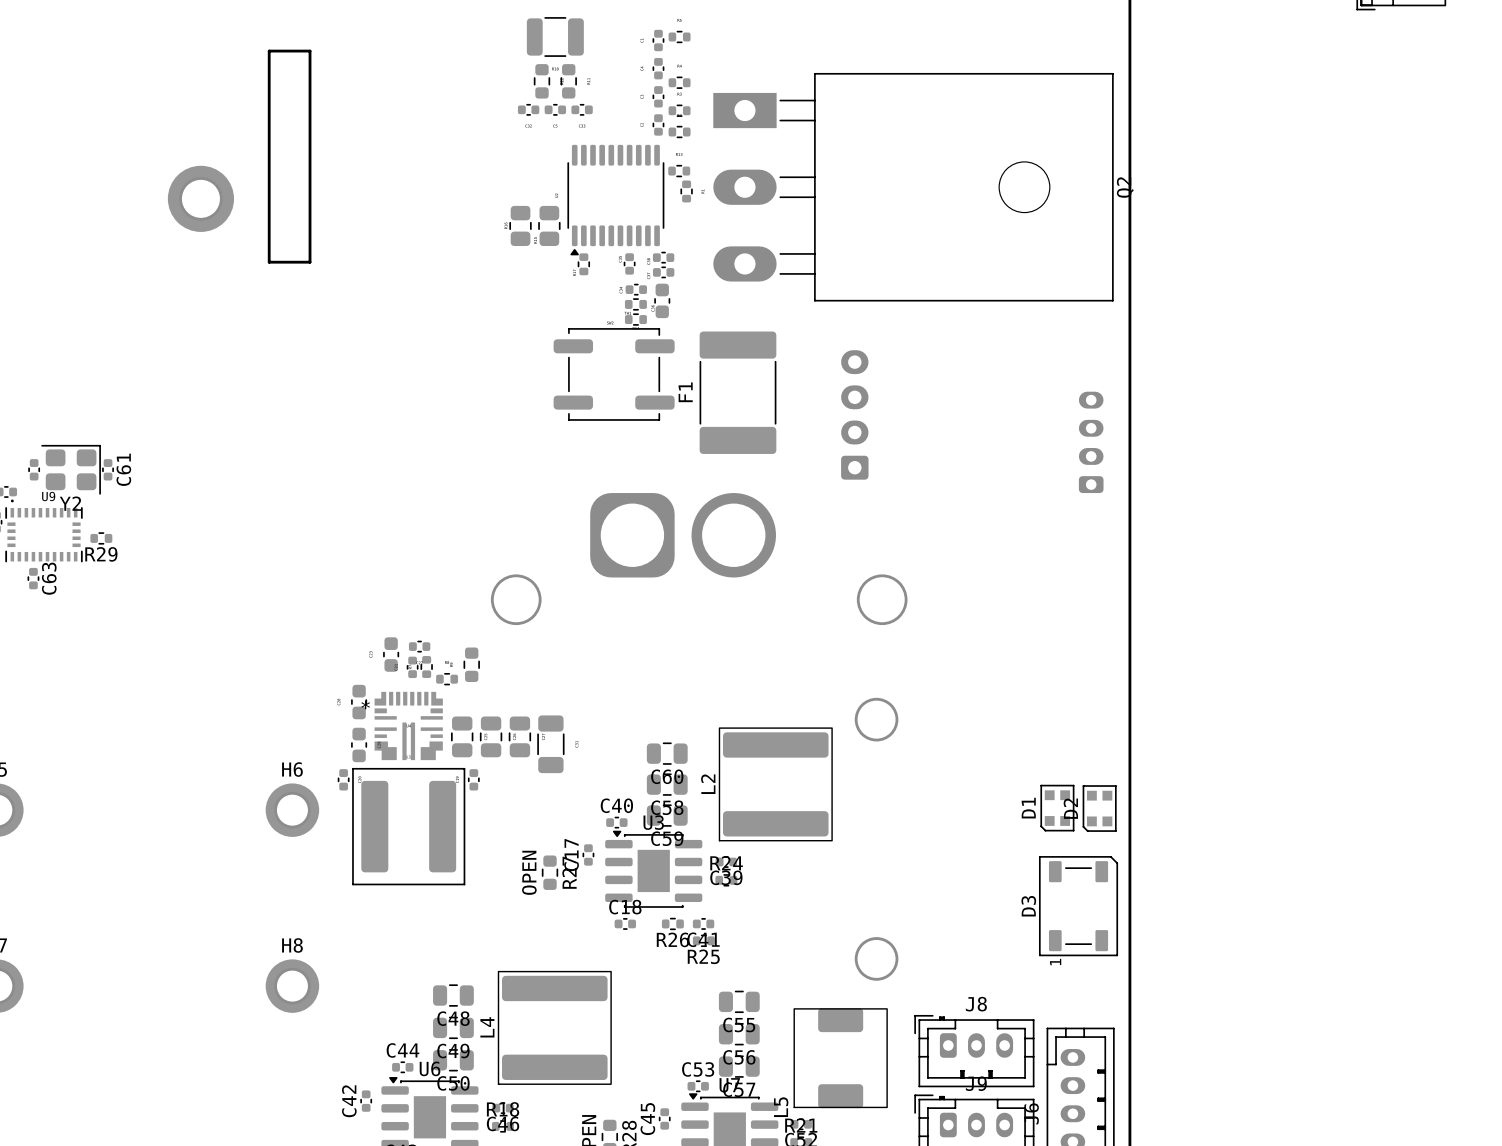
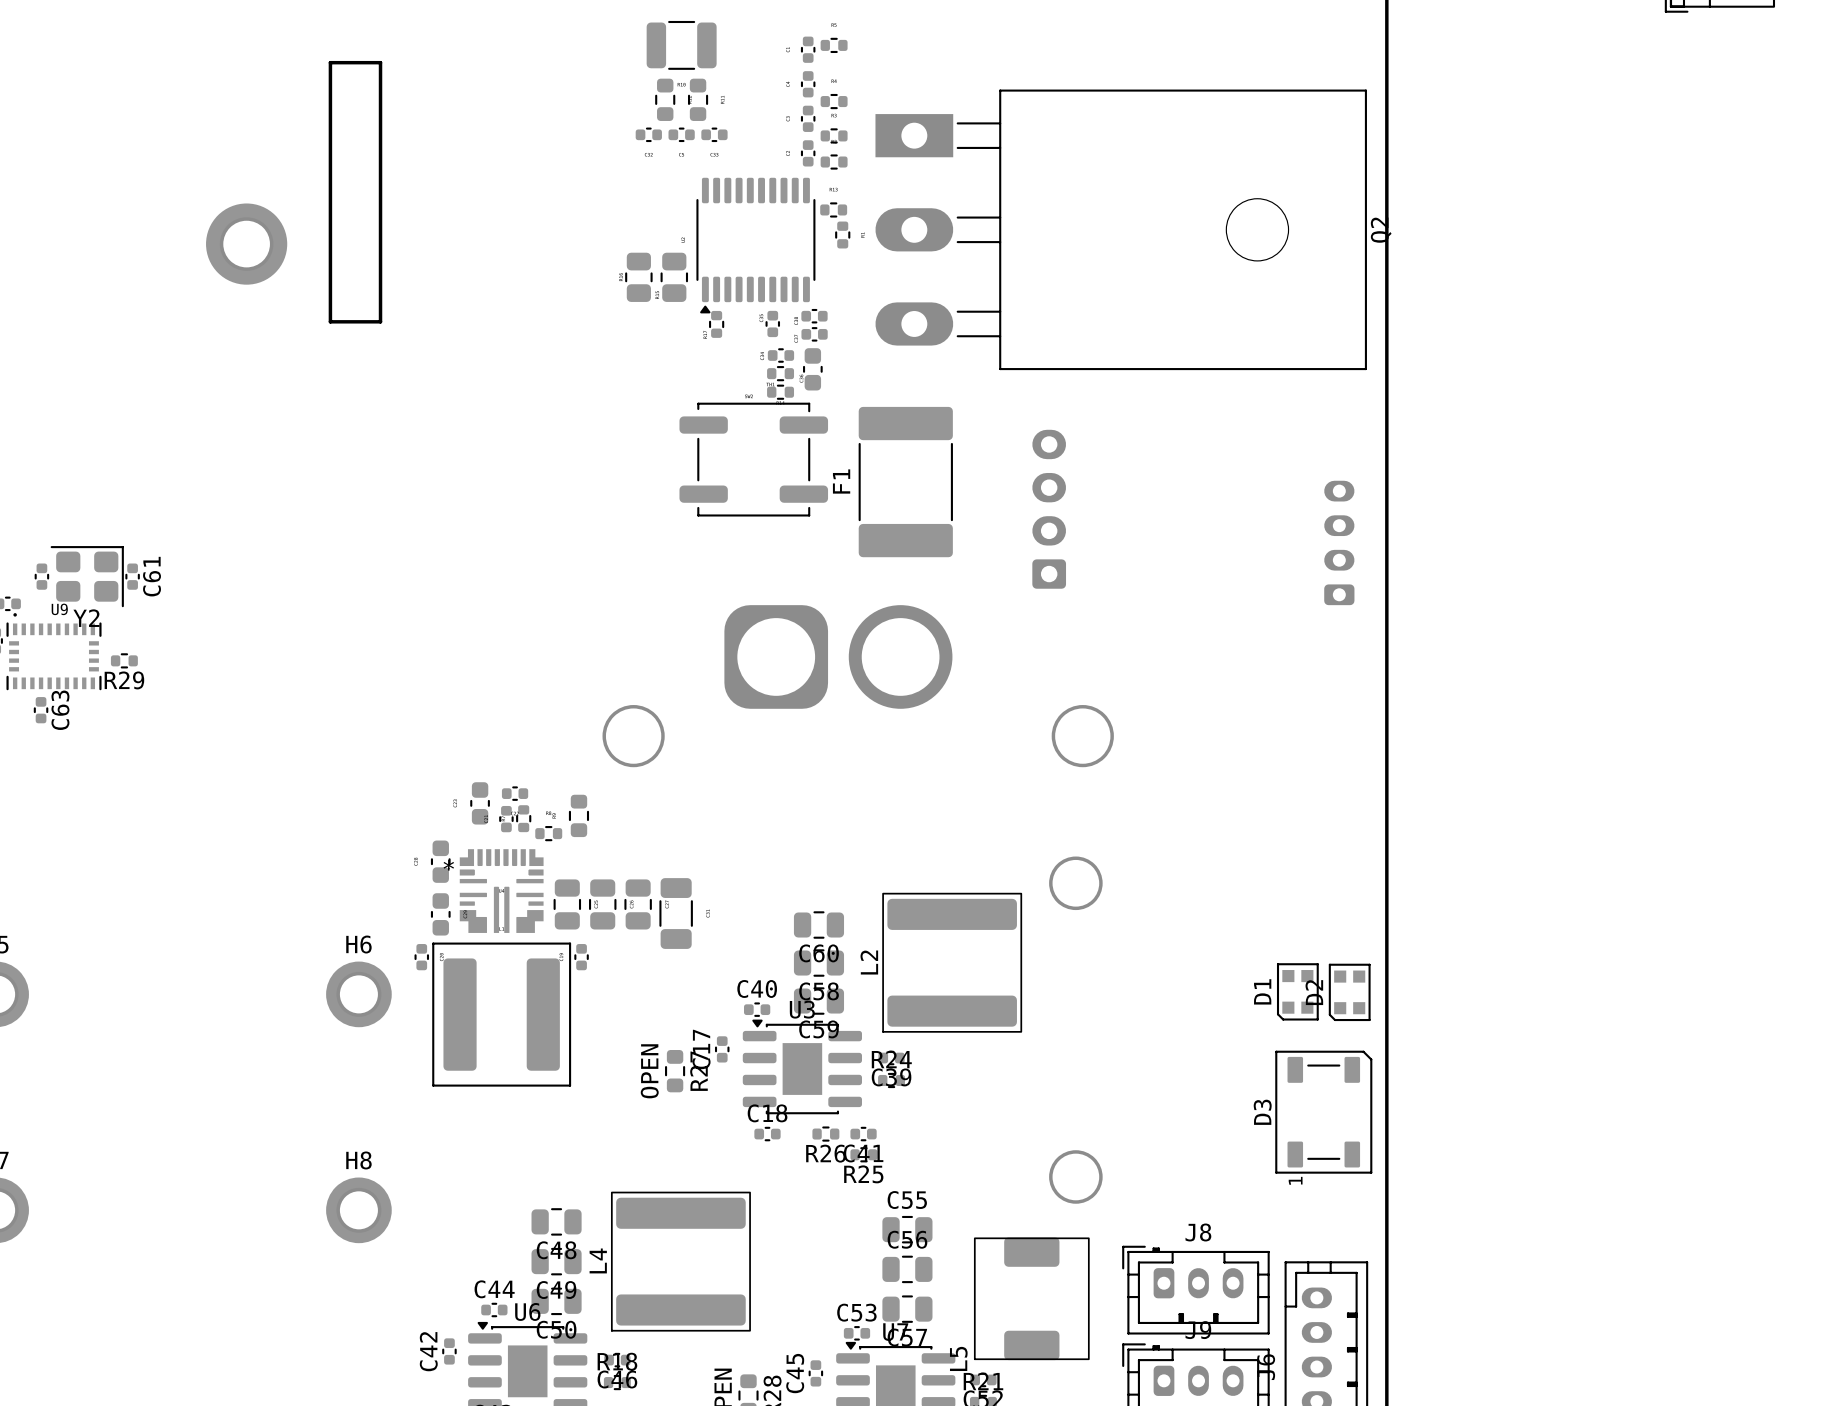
C55 name position: C55 (739, 1024) -> C55 (907, 1200)
C56 name position: C56 (739, 1057) -> C56 (907, 1239)

